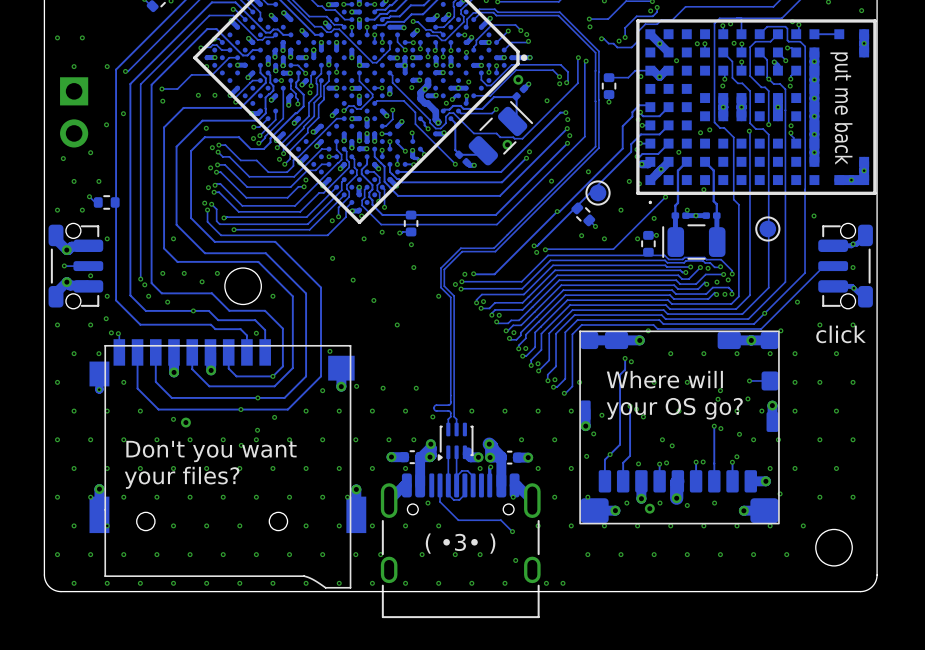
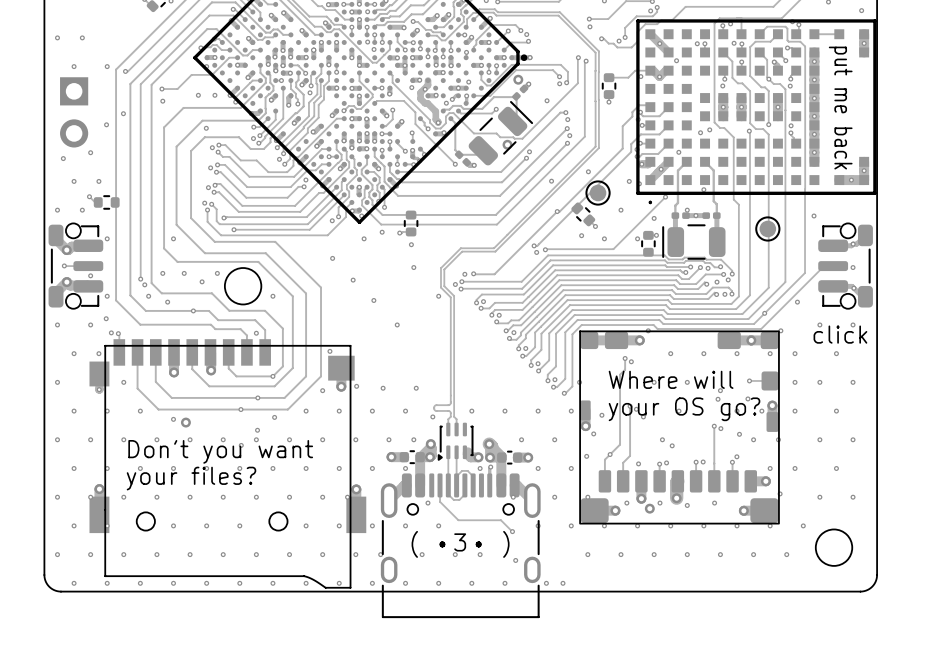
via: none -> (367, 11)
via: none -> (367, 42)
via: none -> (374, 49)

